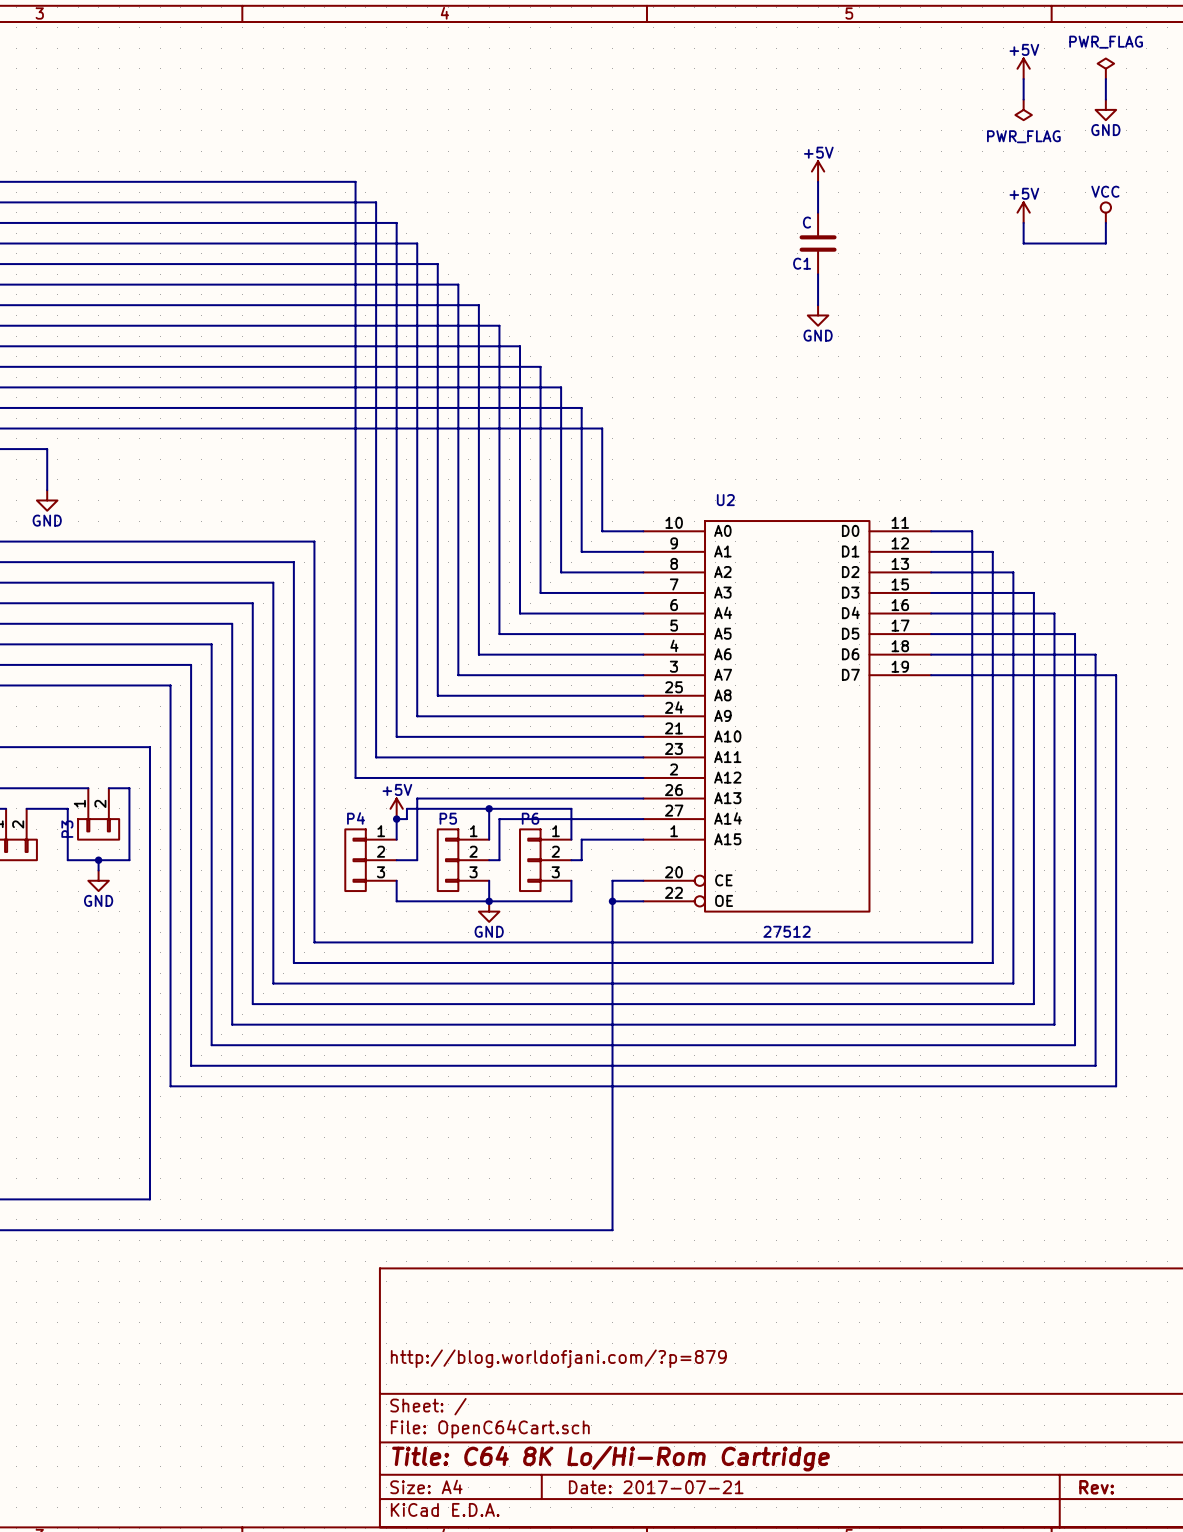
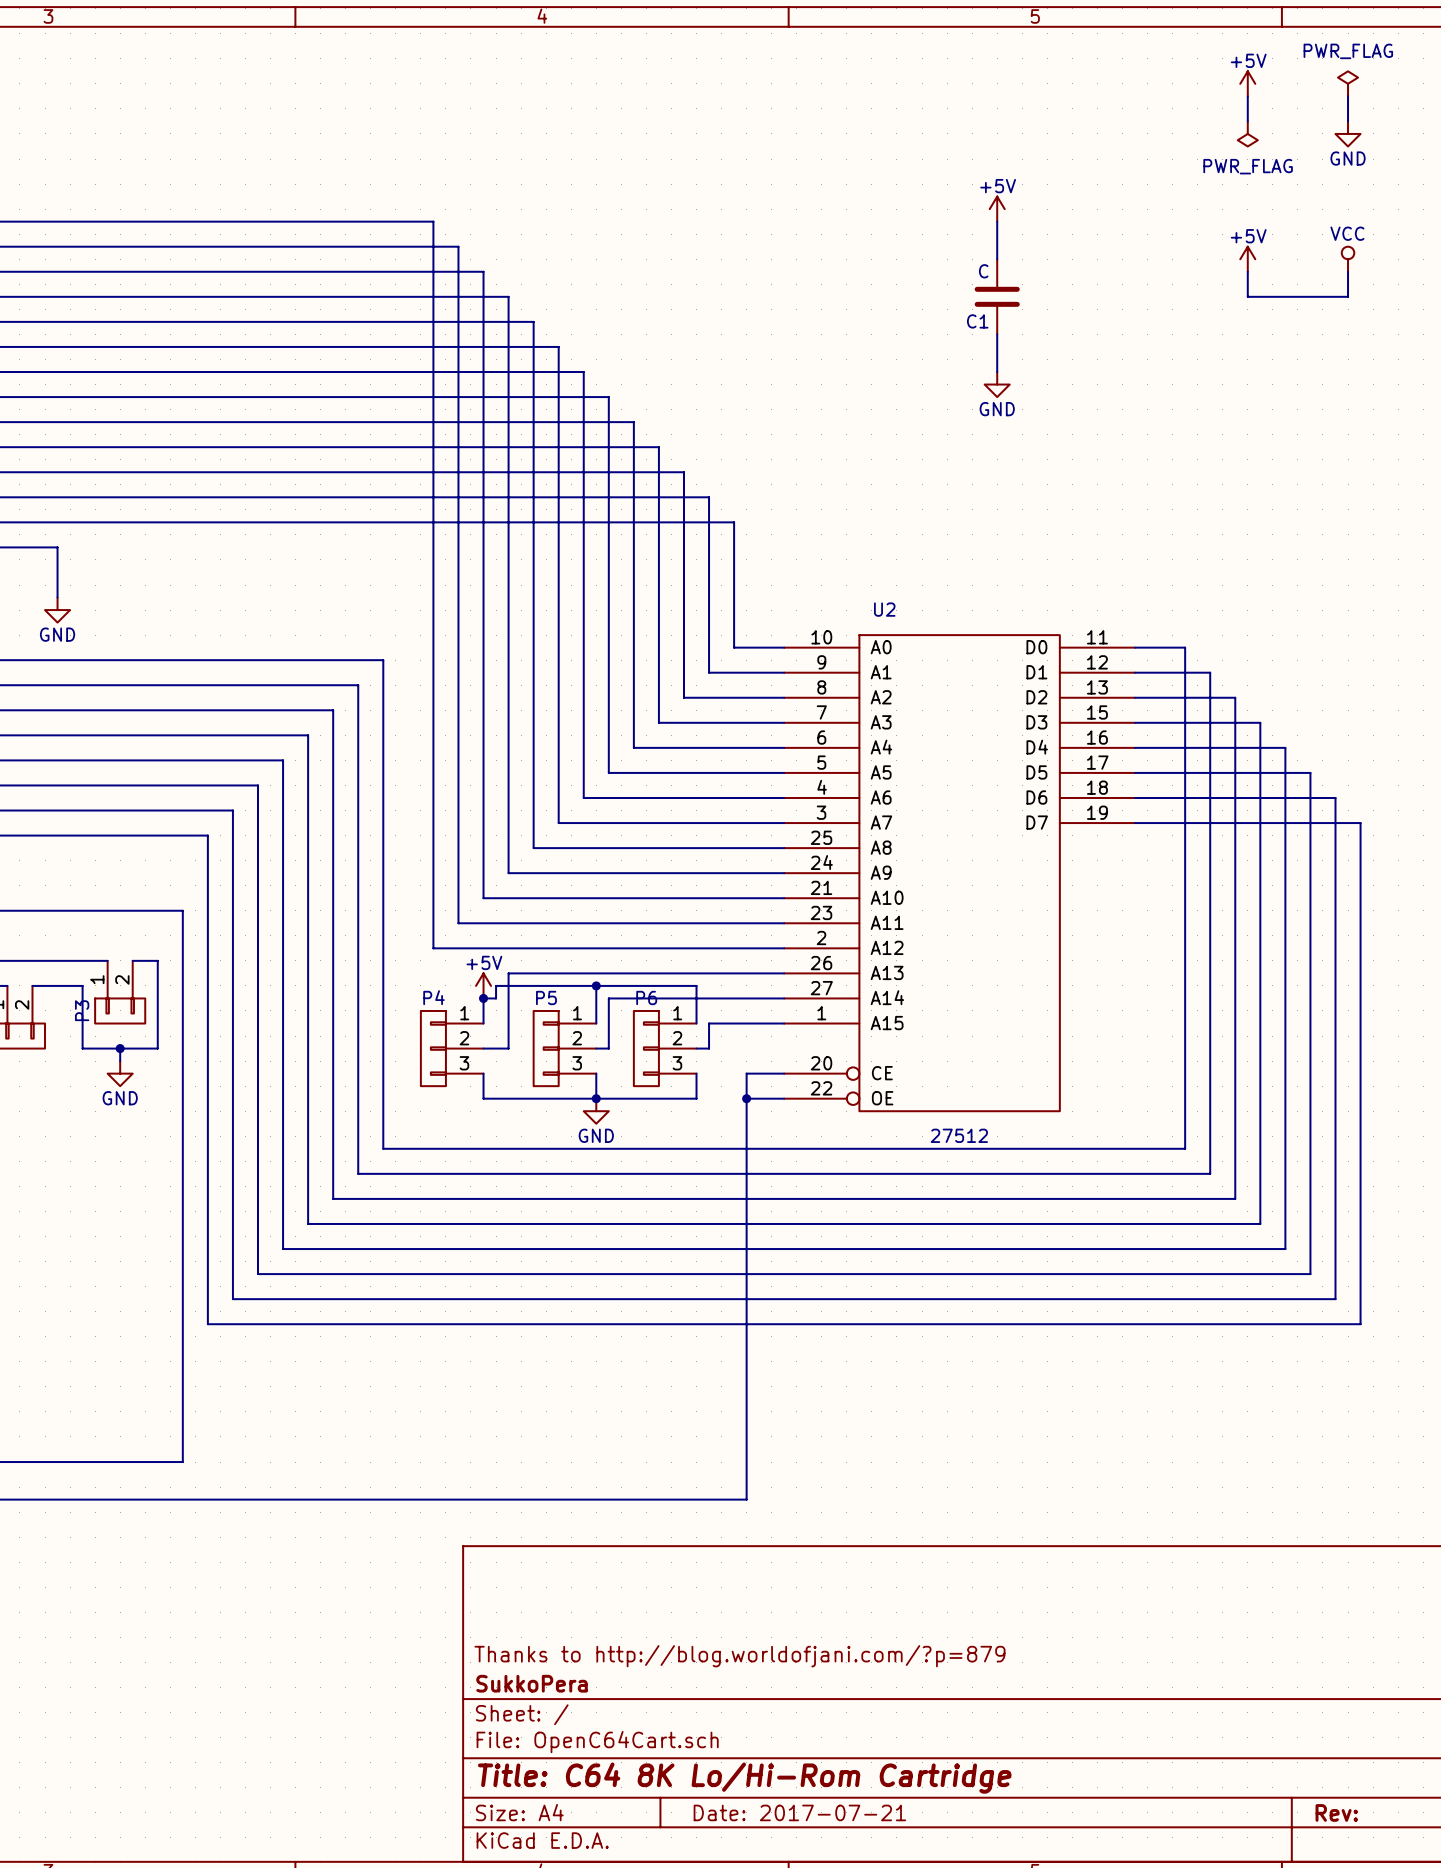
title block: http://blog.worldofjani.com/?p=879 (558, 1358) -> Thanks to http://blog.worldofjani.com/?p=879 (739, 1656)
title block: none -> SukkoPera (532, 1683)

